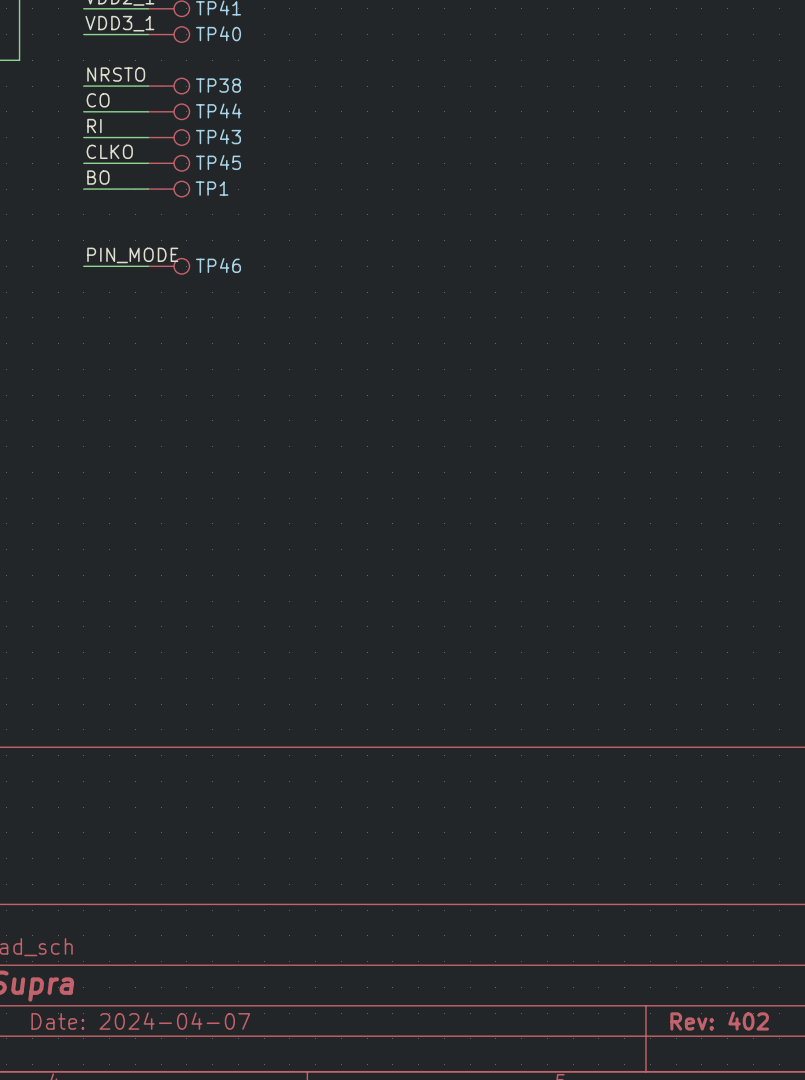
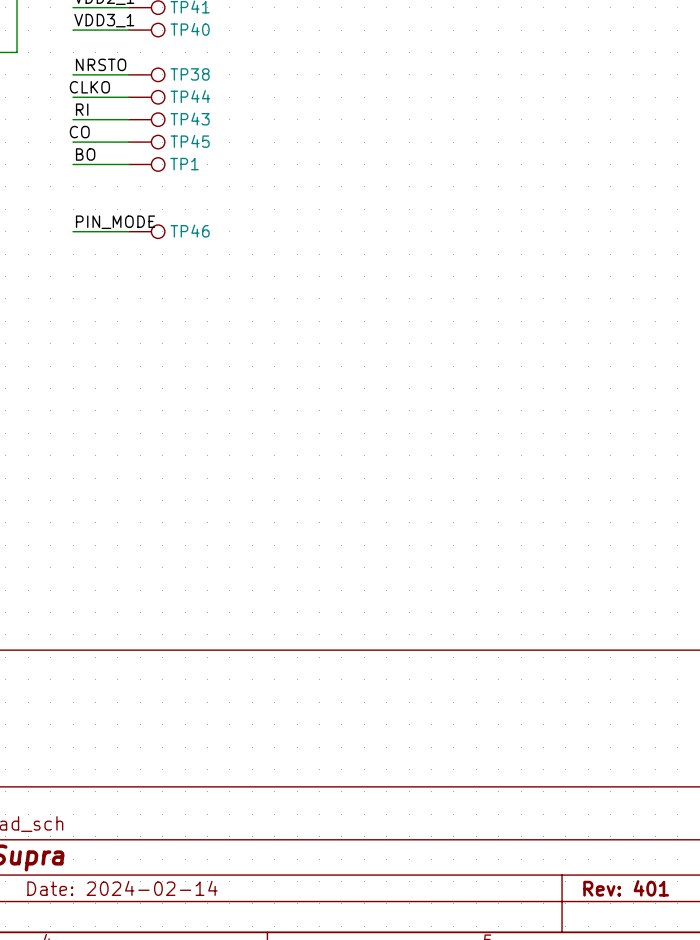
label: CO (98, 100) -> CLKO (89, 87)
label: CLKO (109, 151) -> CO (79, 132)
title block: Date: 2024-04-07 (140, 1021) -> Date: 2024-02-14 (122, 888)
title block: Rev: 402 (719, 1021) -> Rev: 401 (626, 888)

